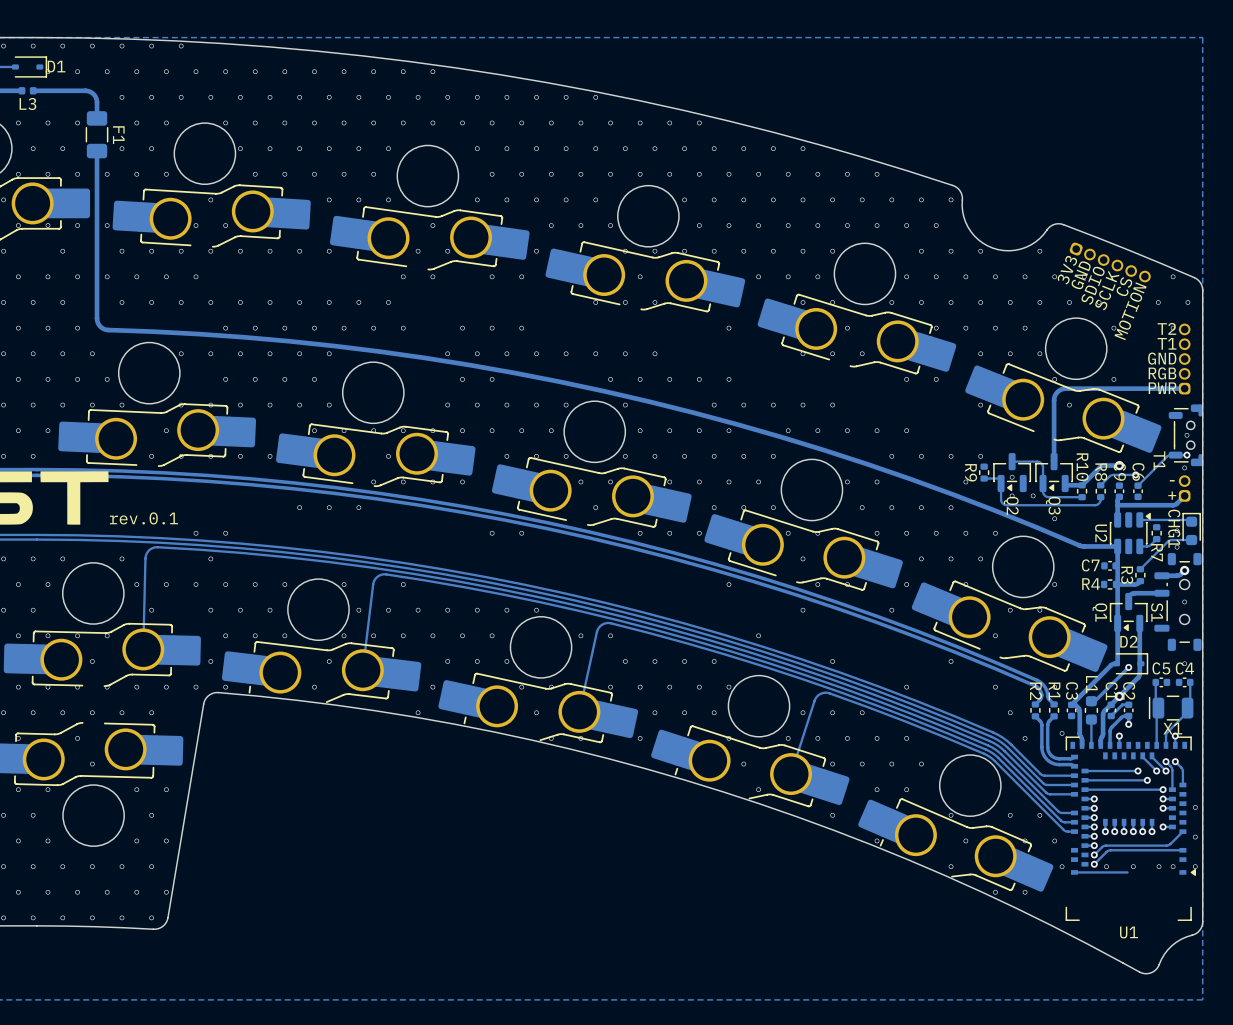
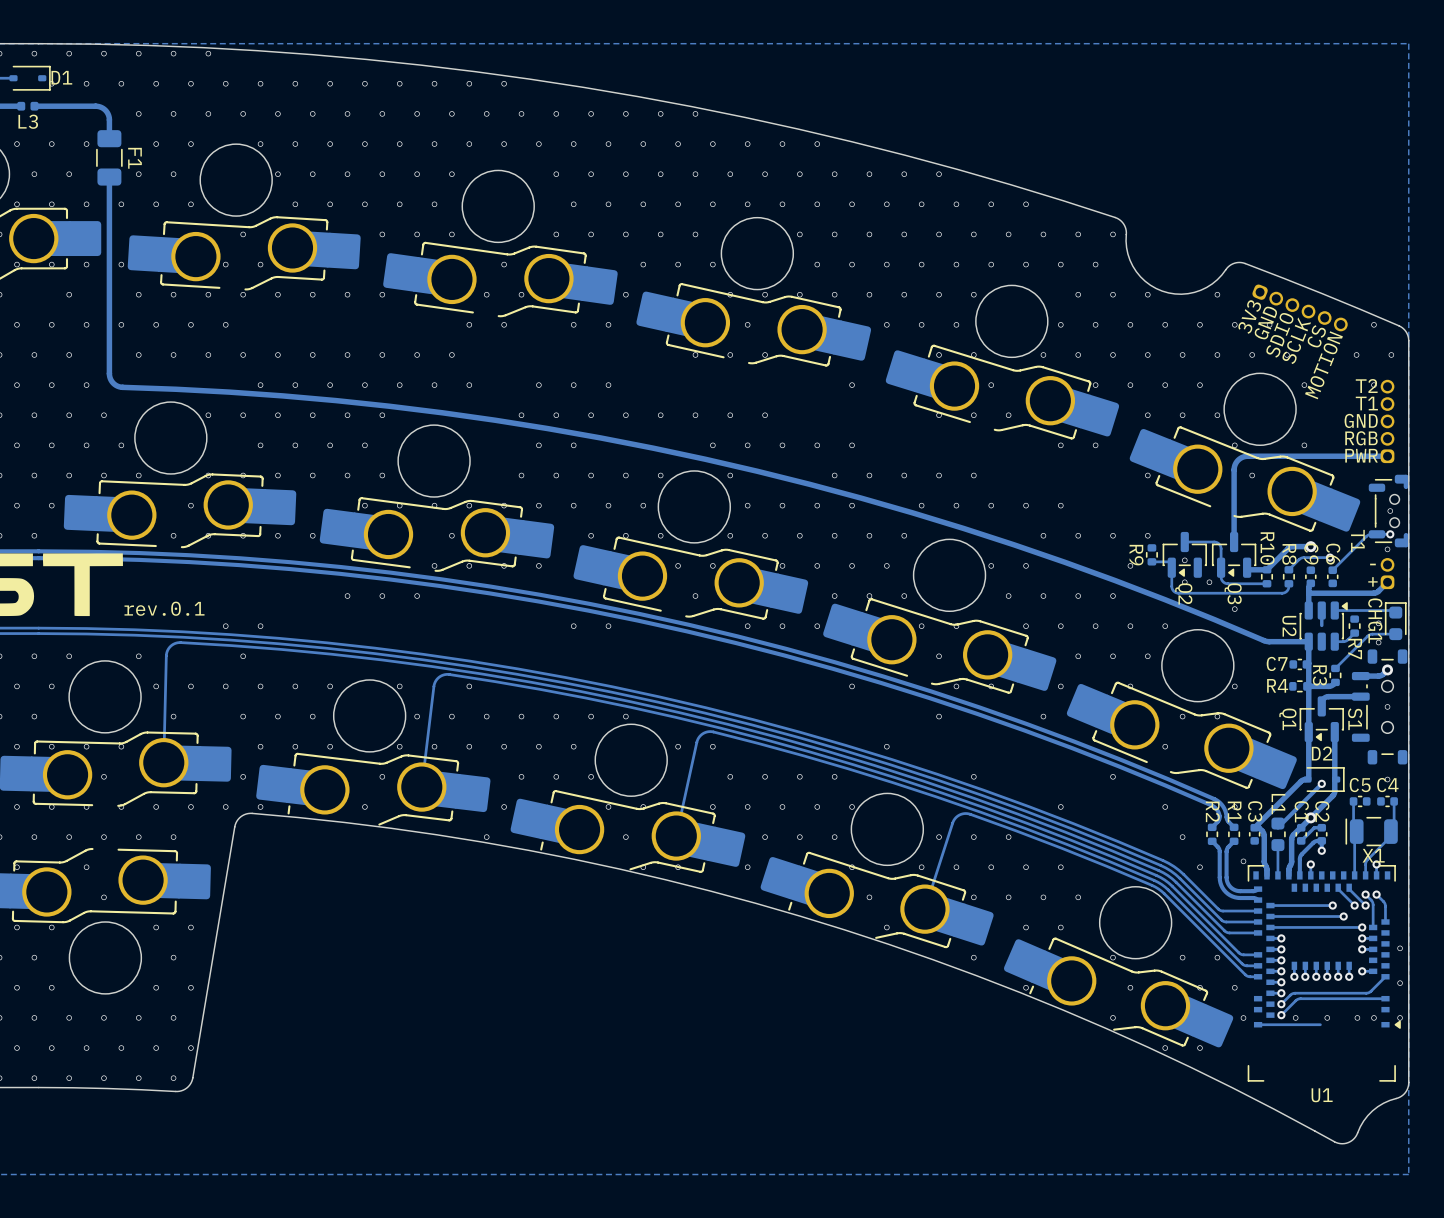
track: none -> (1321, 610) (1321, 625)

